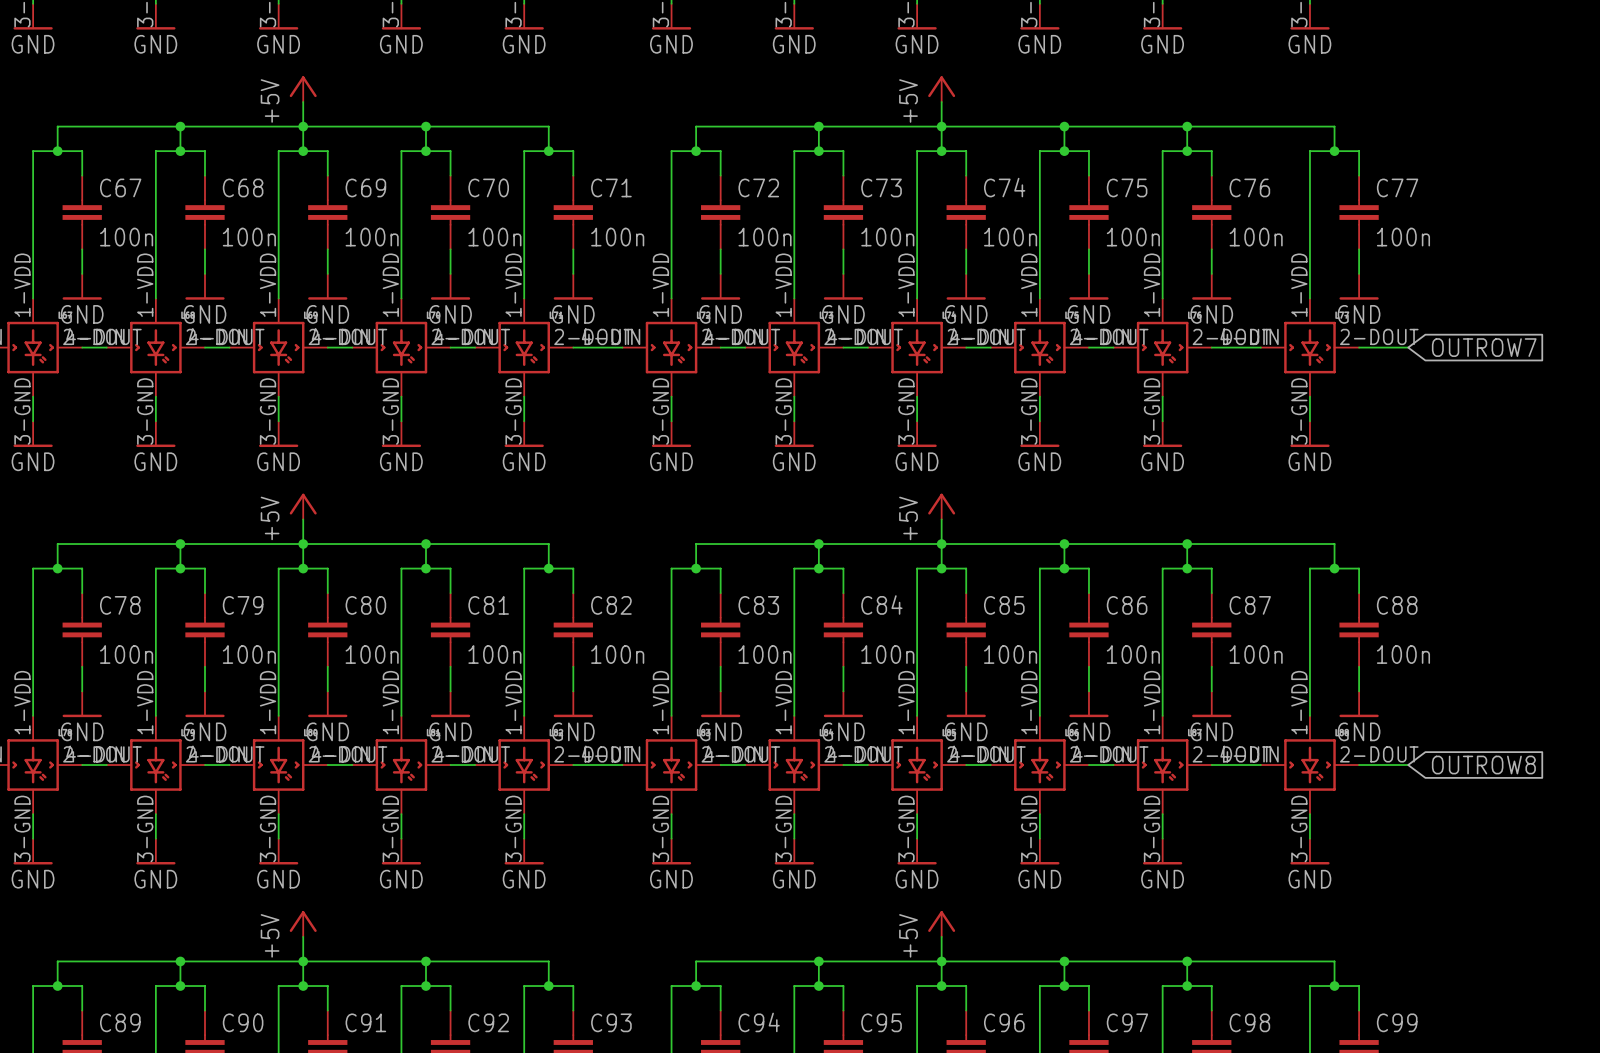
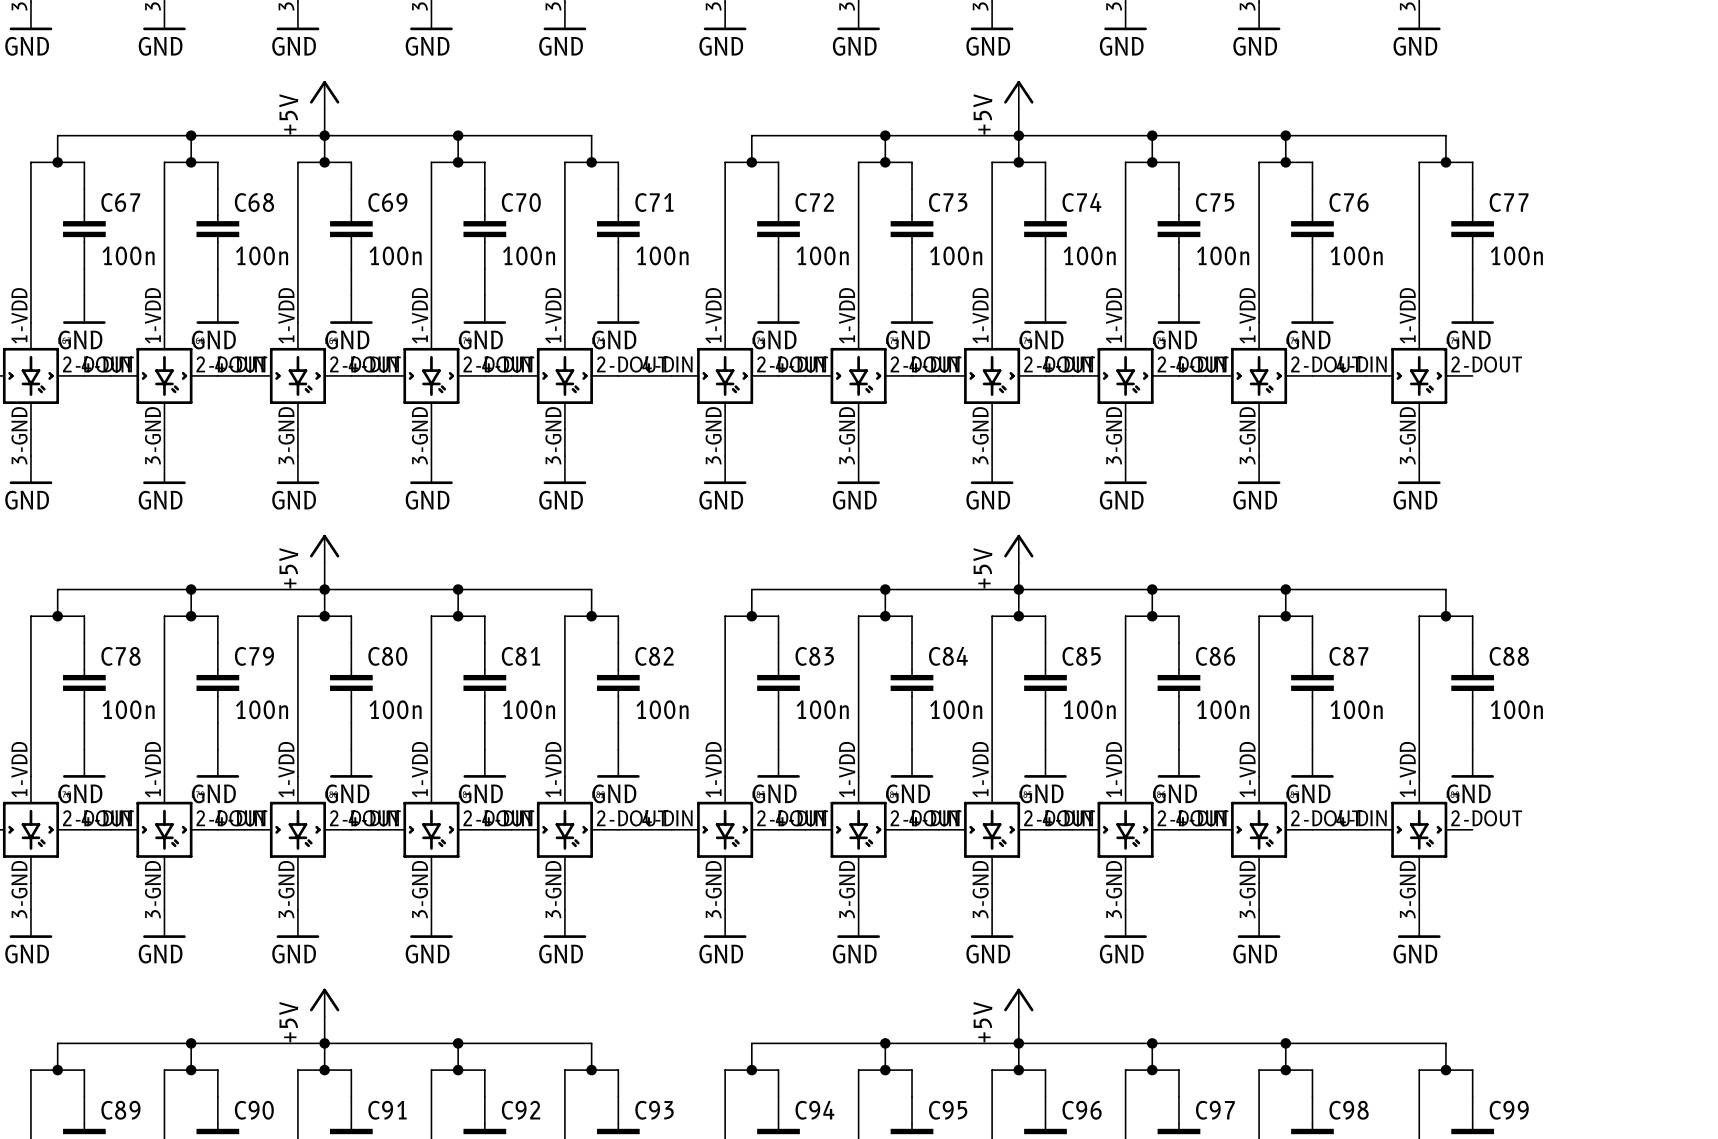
wire: (1359, 347) (1408, 347) -> none
global label: OUTROW7 (1484, 347) -> none
wire: (1359, 765) (1408, 765) -> none
global label: OUTROW8 (1483, 765) -> none

